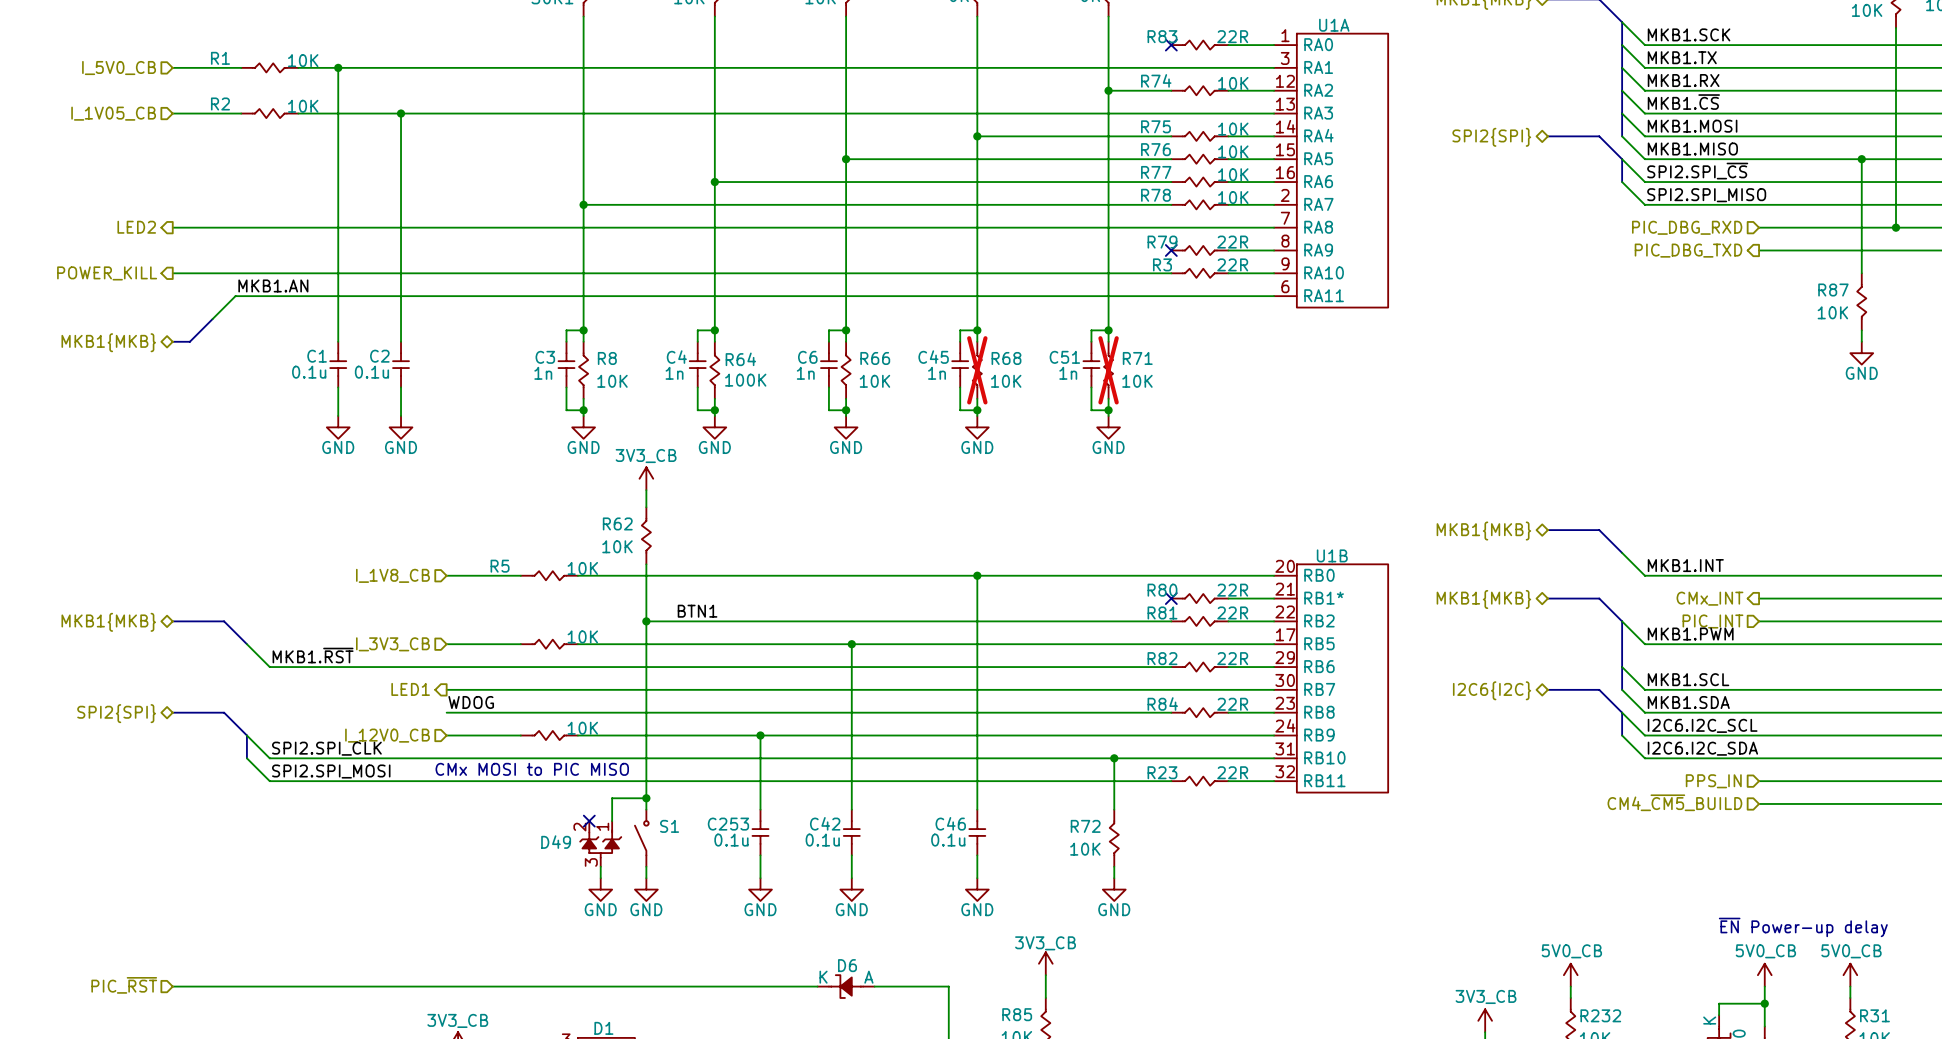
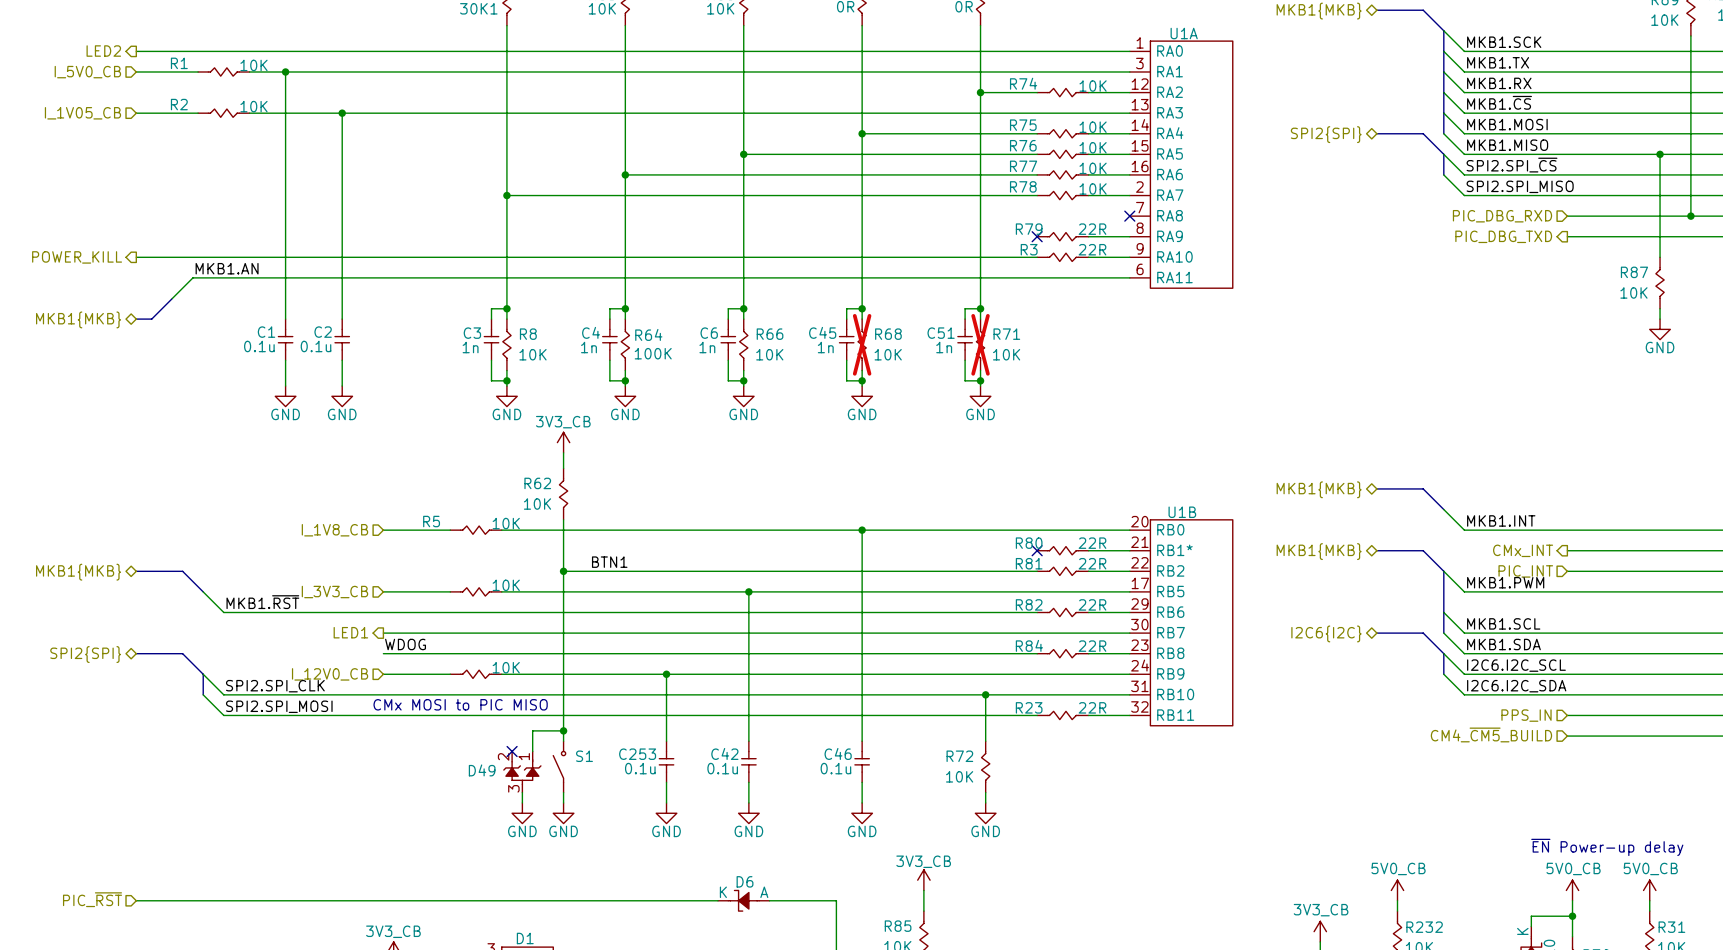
wire: none -> (136, 51) (1088, 51)
no-connect mark: (1171, 45) -> none
R83: 22R (1199, 45) -> none
hierarchical label position: LED2 (136, 227) -> LED2 (103, 51)
wire: (172, 227) (1274, 227) -> none
no-connect mark: none -> (1129, 216)

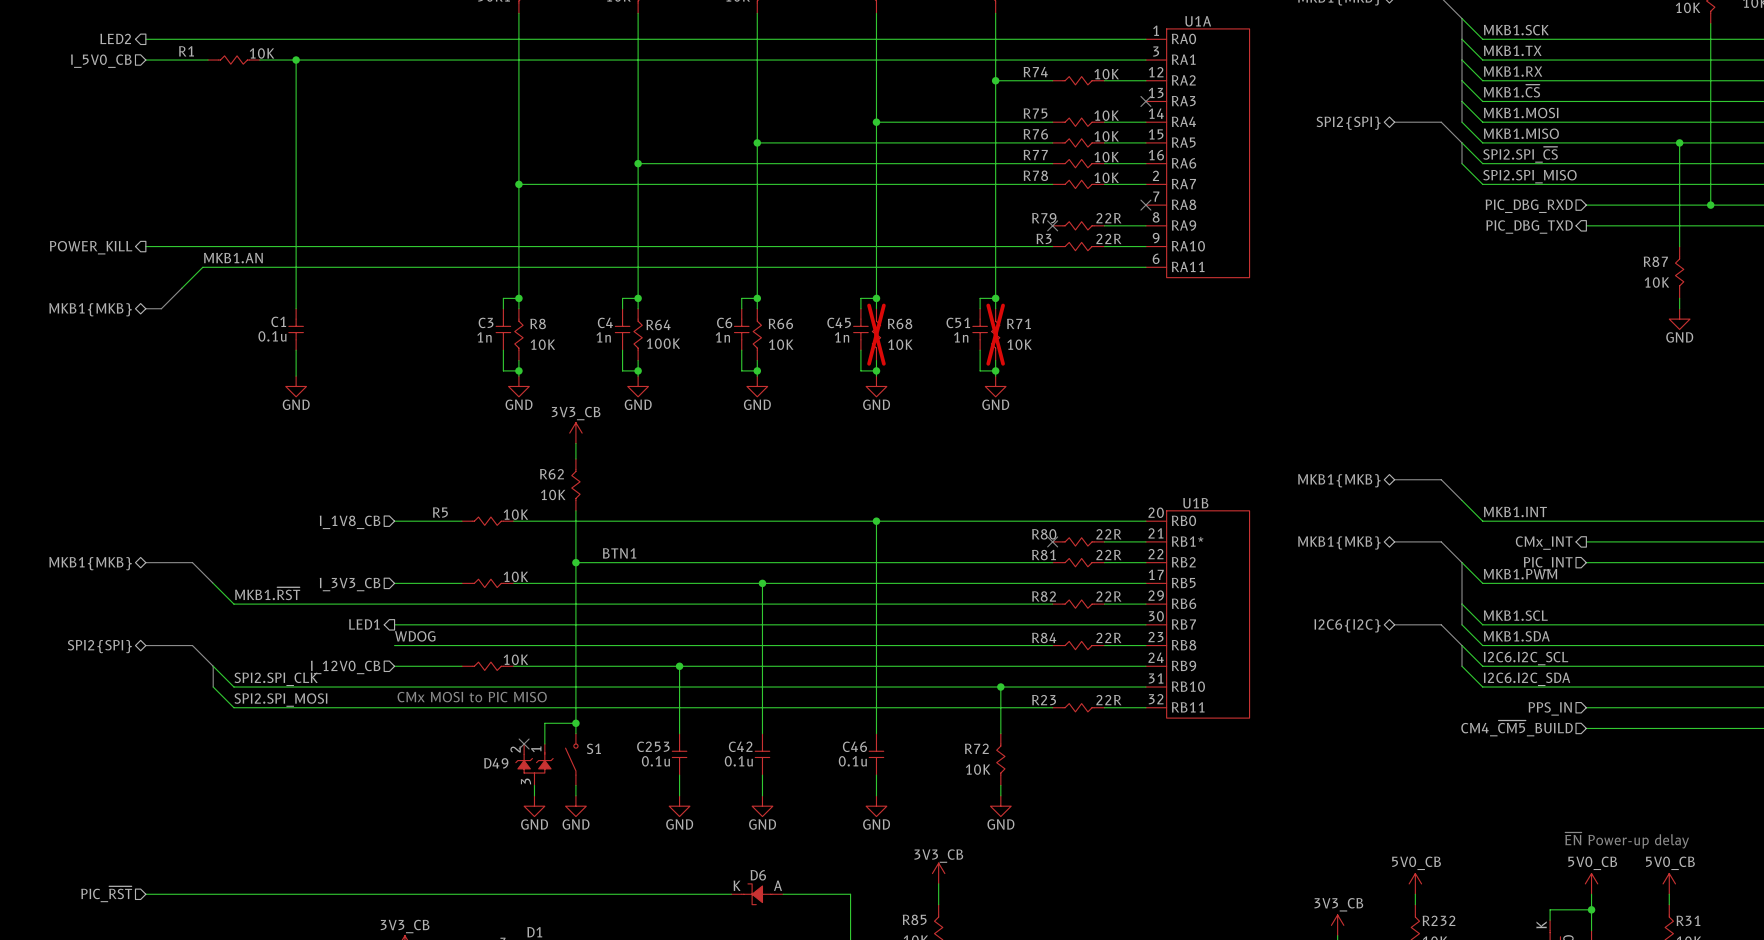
hierarchical label: I_1V05_CB (82, 113) -> none
wire: (136, 113) (198, 113) -> none
R2: 10K (223, 113) -> none
wire: (249, 113) (1129, 113) -> none
wire: (342, 113) (342, 319) -> none
junction: (342, 113) -> none
no-connect mark: none -> (1145, 101)
C2: 0.1u (342, 339) -> none
wire: (342, 360) (342, 386) -> none
power symbol: GND (342, 396) -> none

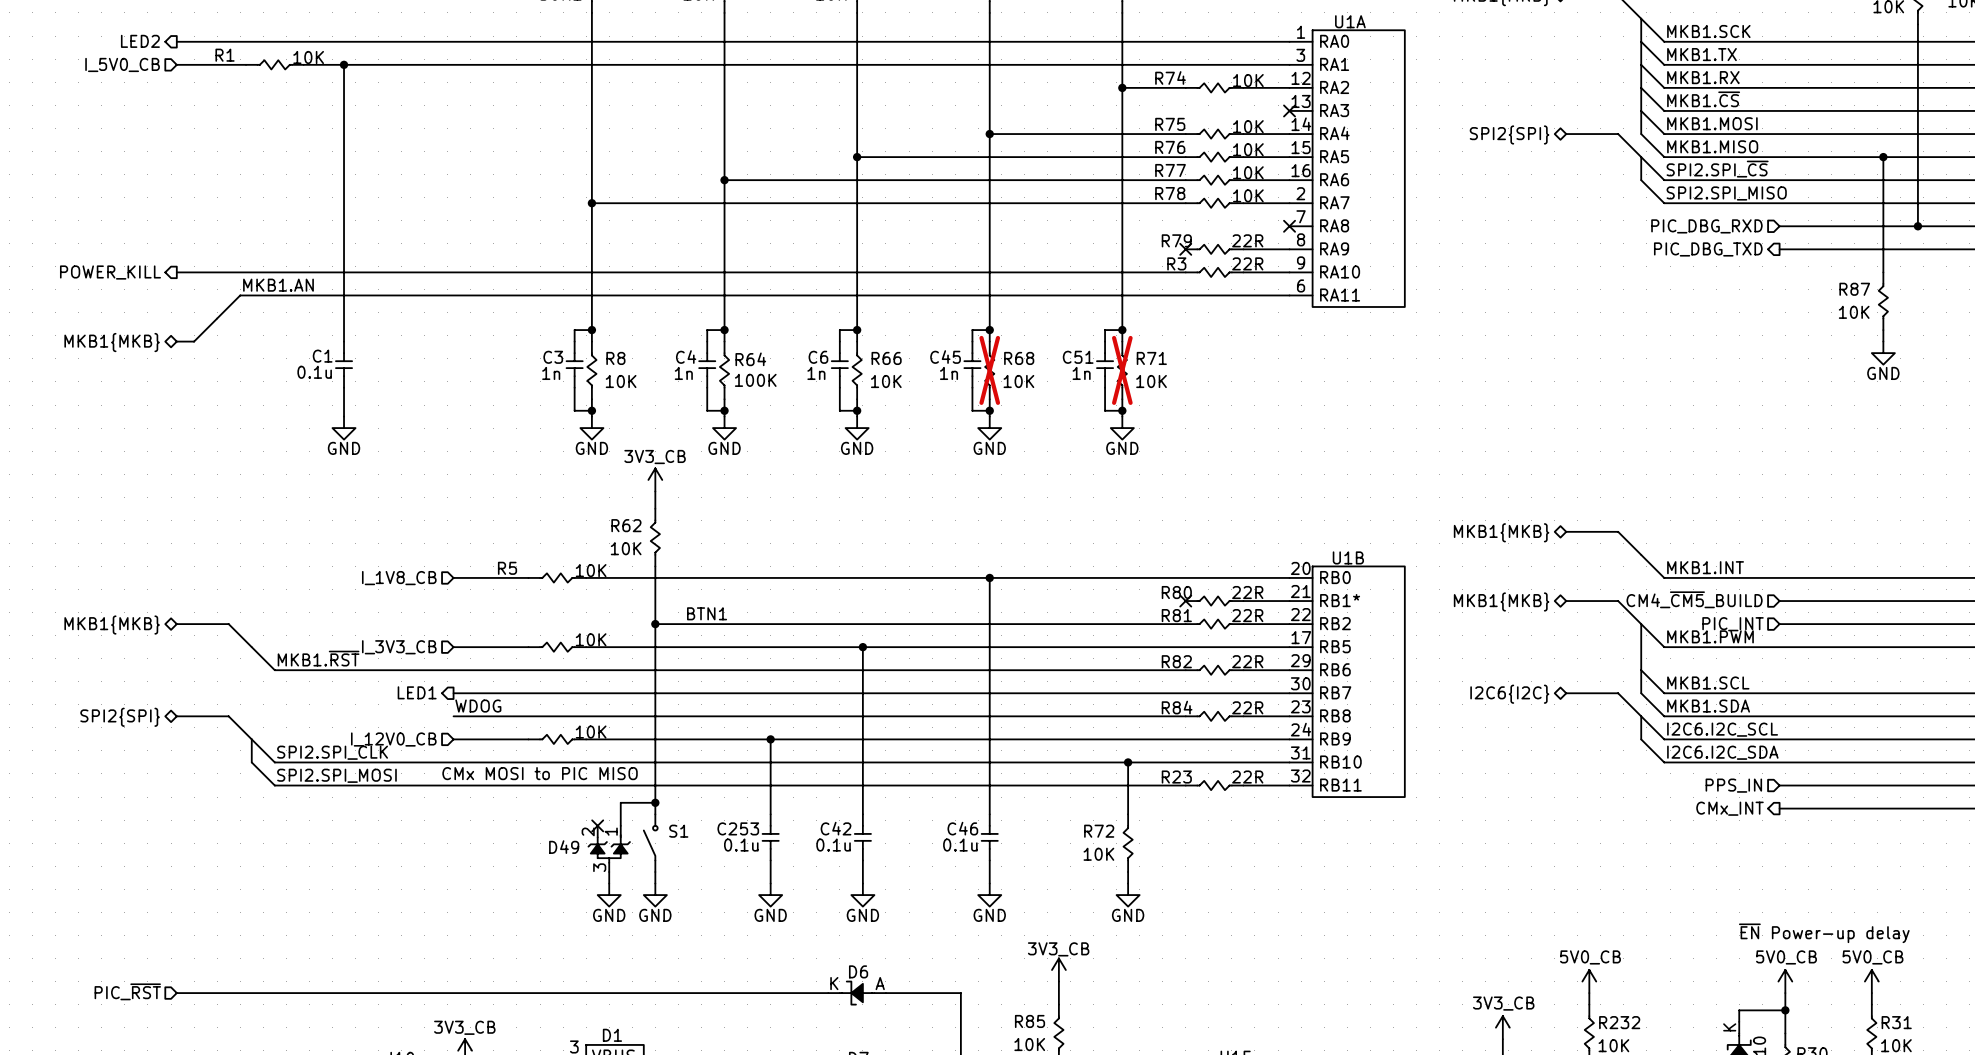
hierarchical label shape: output (1544, 543) -> input (1694, 599)
hierarchical label: CMx_INT (1544, 543) -> CM4_~{CM5}_BUILD (1694, 599)
hierarchical label shape: input (1517, 728) -> output (1729, 808)
hierarchical label: CM4_~{CM5}_BUILD (1517, 728) -> CMx_INT (1729, 808)

